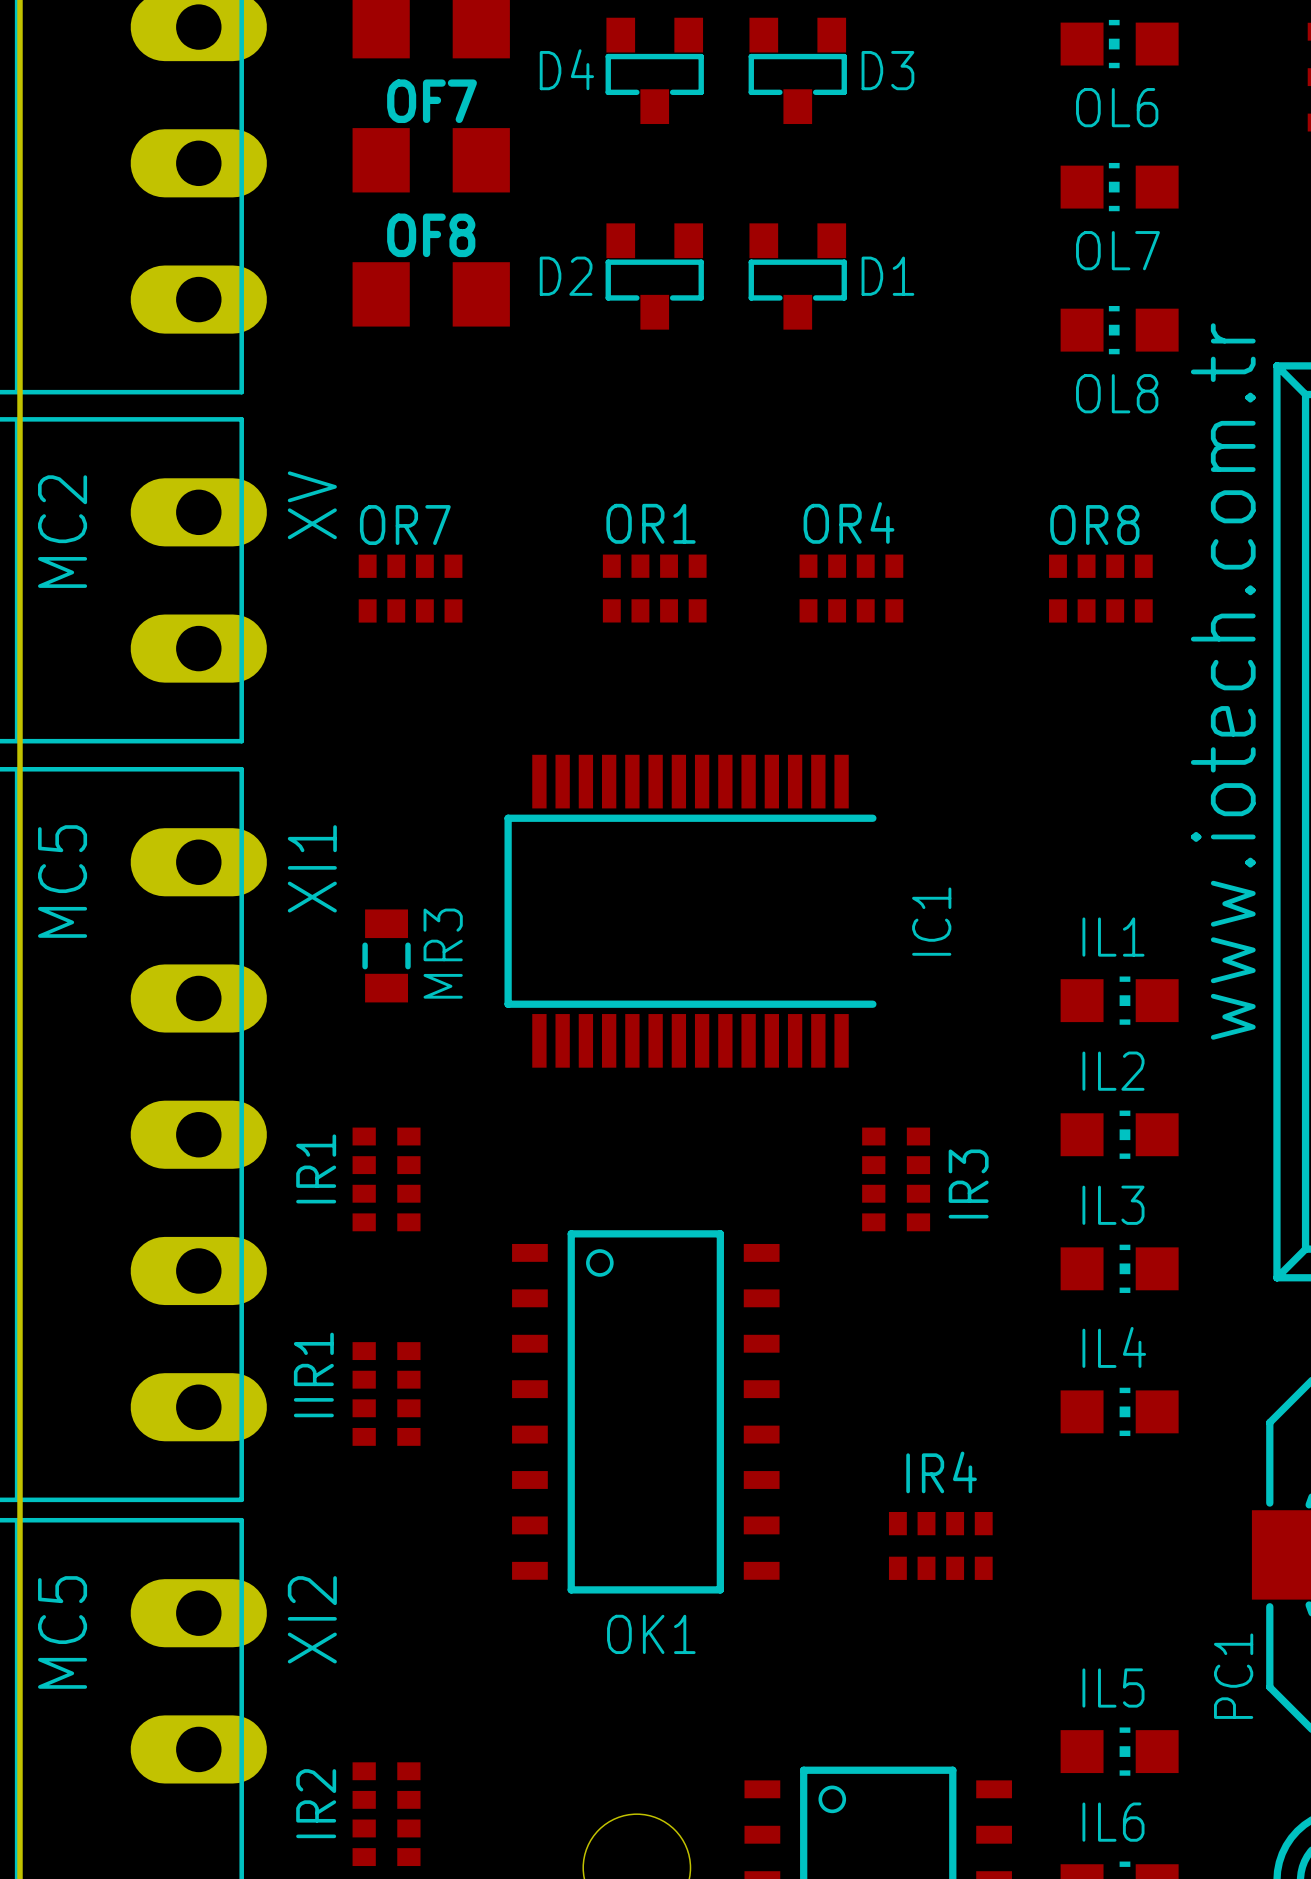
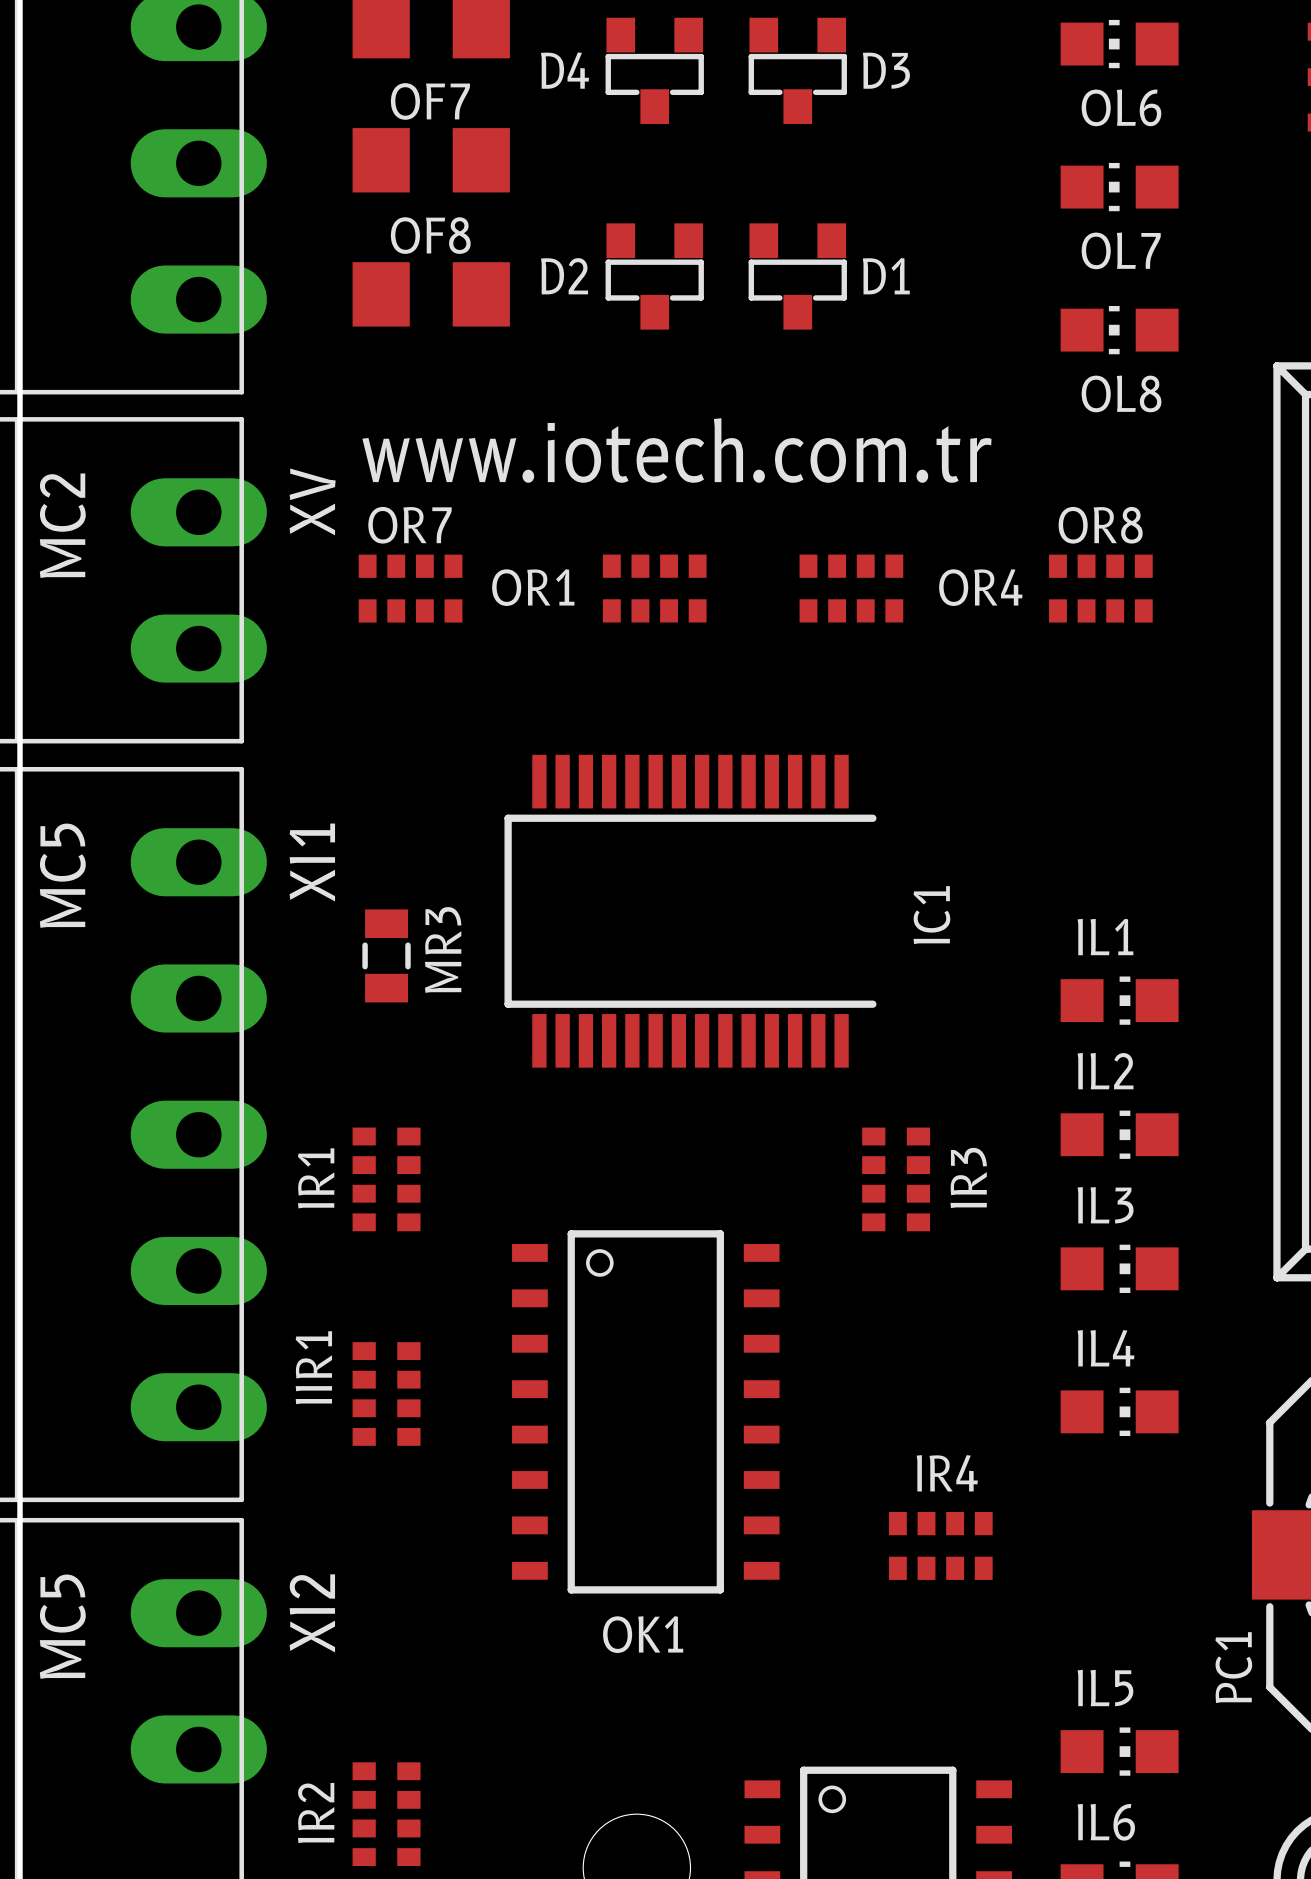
text: none -> www.iotech.com.tr (676, 450)
OR4 name position: OR4 (848, 522) -> OR4 (980, 587)
OR1 name position: OR1 (651, 523) -> OR1 (533, 587)
text: www.iotech.com.tr (1223, 681) -> none

